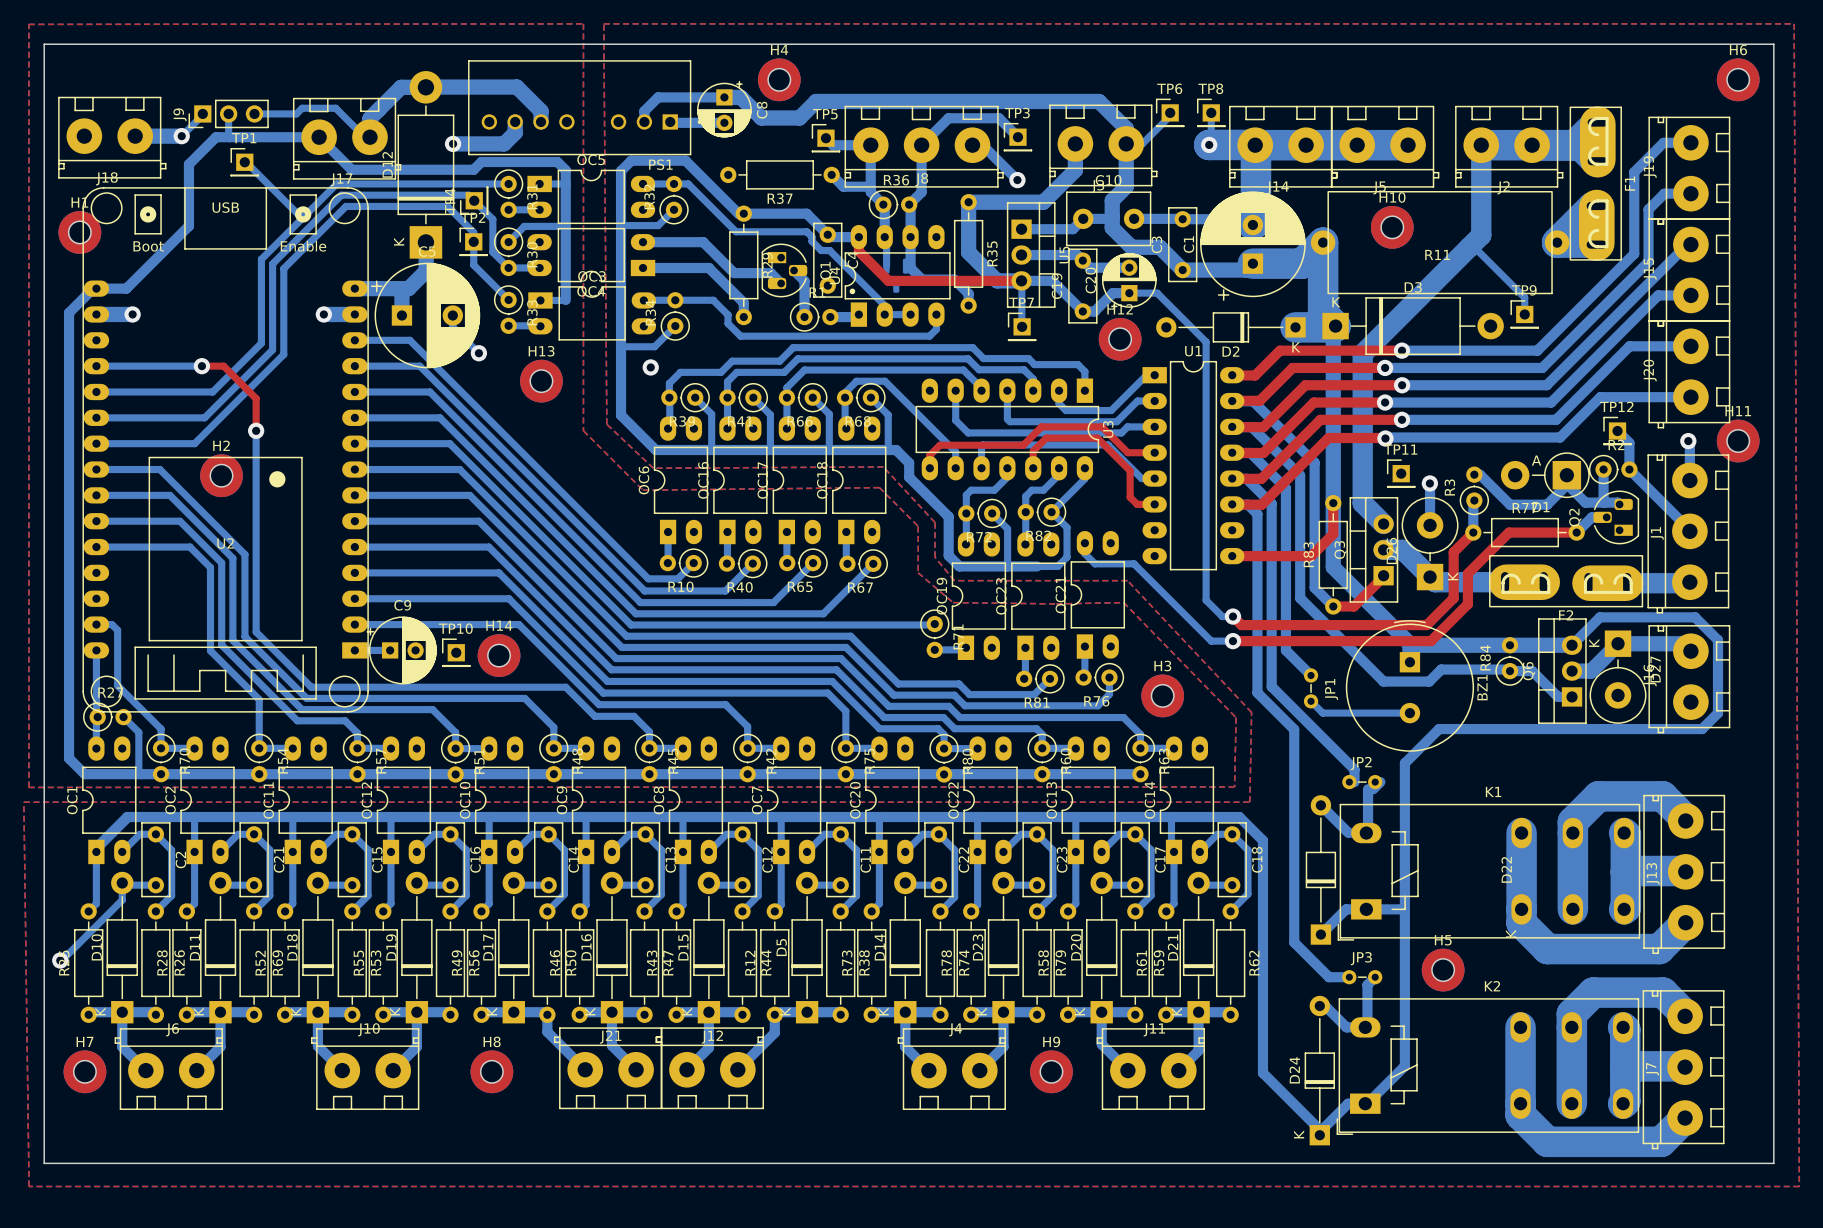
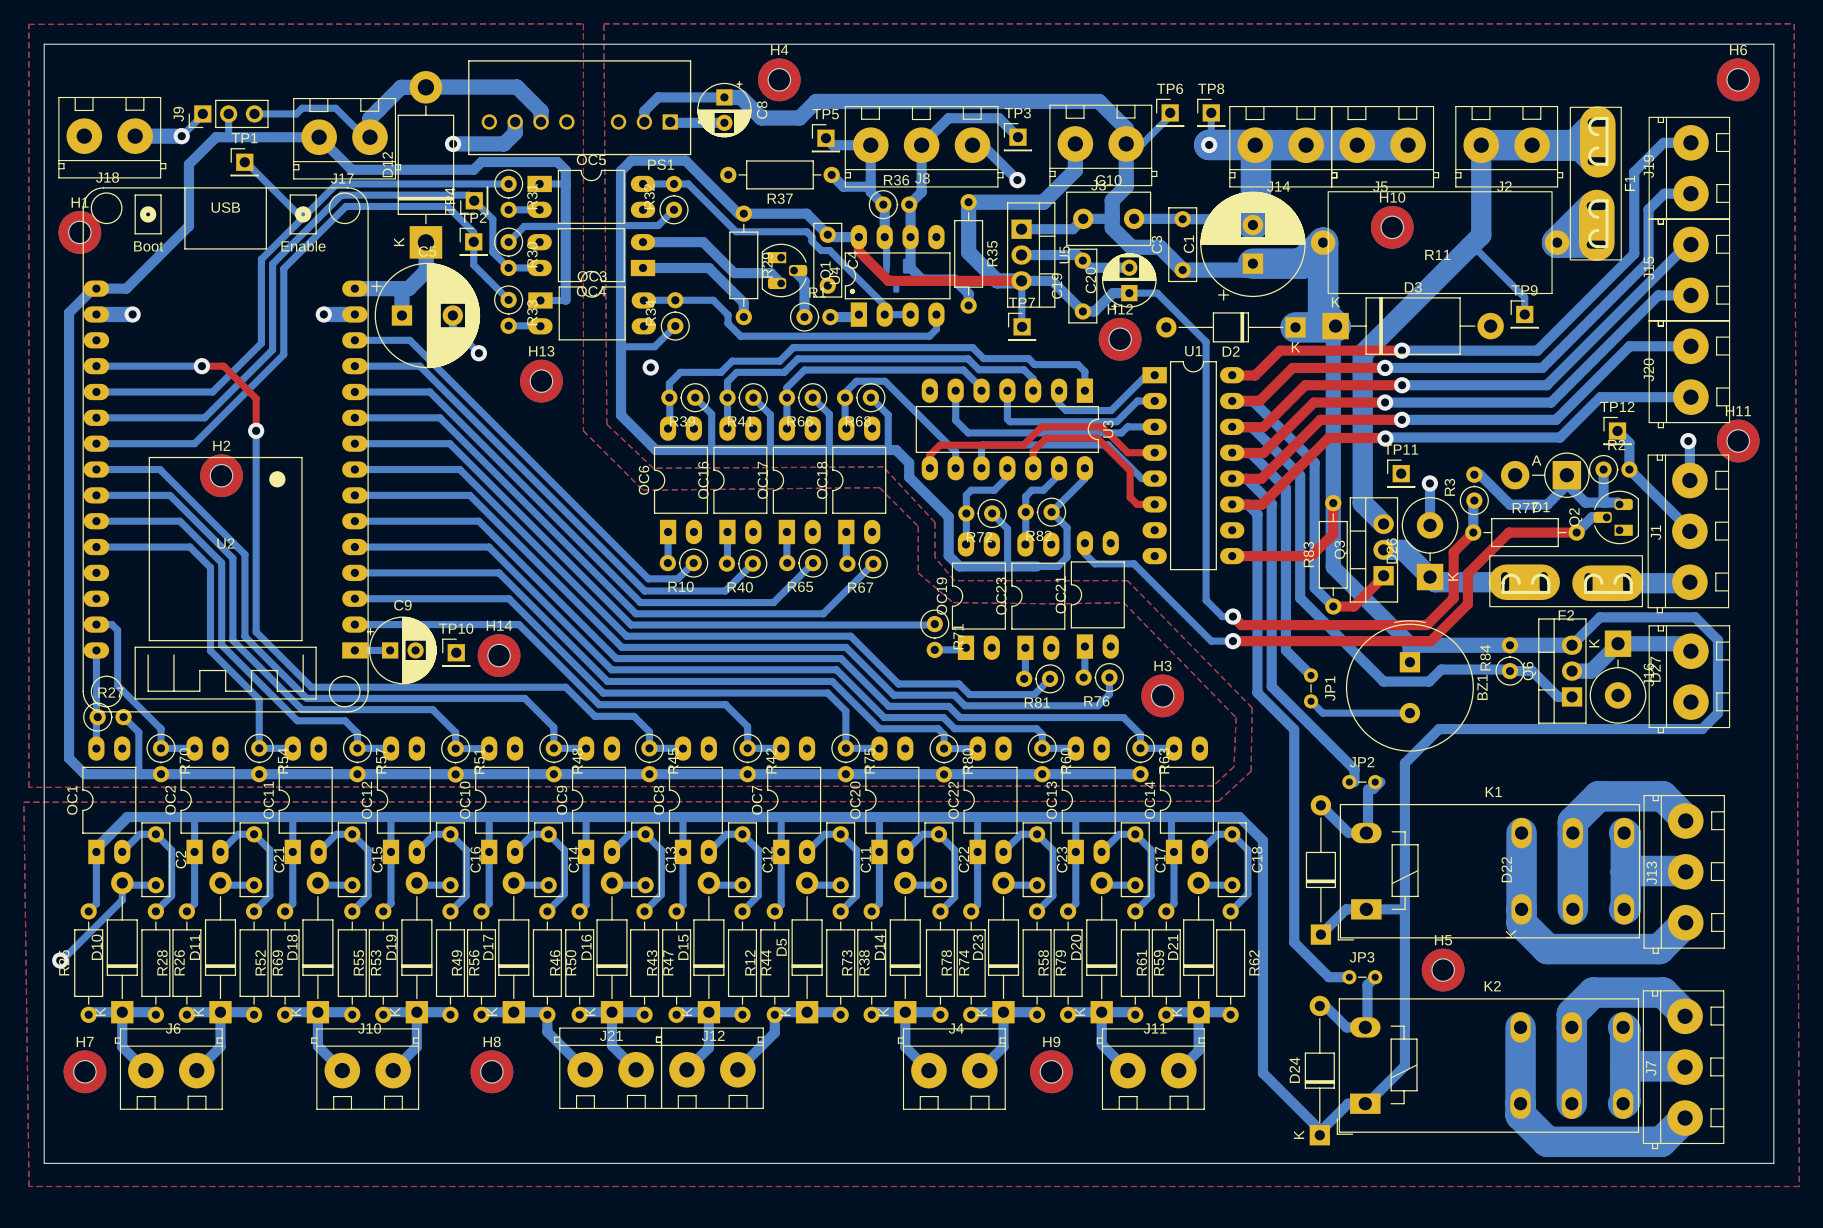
top zone outline: (1127, 580) (1251, 712) (1249, 802) (23, 802) -> (1127, 580) (1252, 707) (1251, 771) (1218, 801) (23, 802)
top zone outline: (1236, 717) (1234, 786) (28, 787) -> (1236, 717) (1234, 766) (1213, 785) (28, 787)

